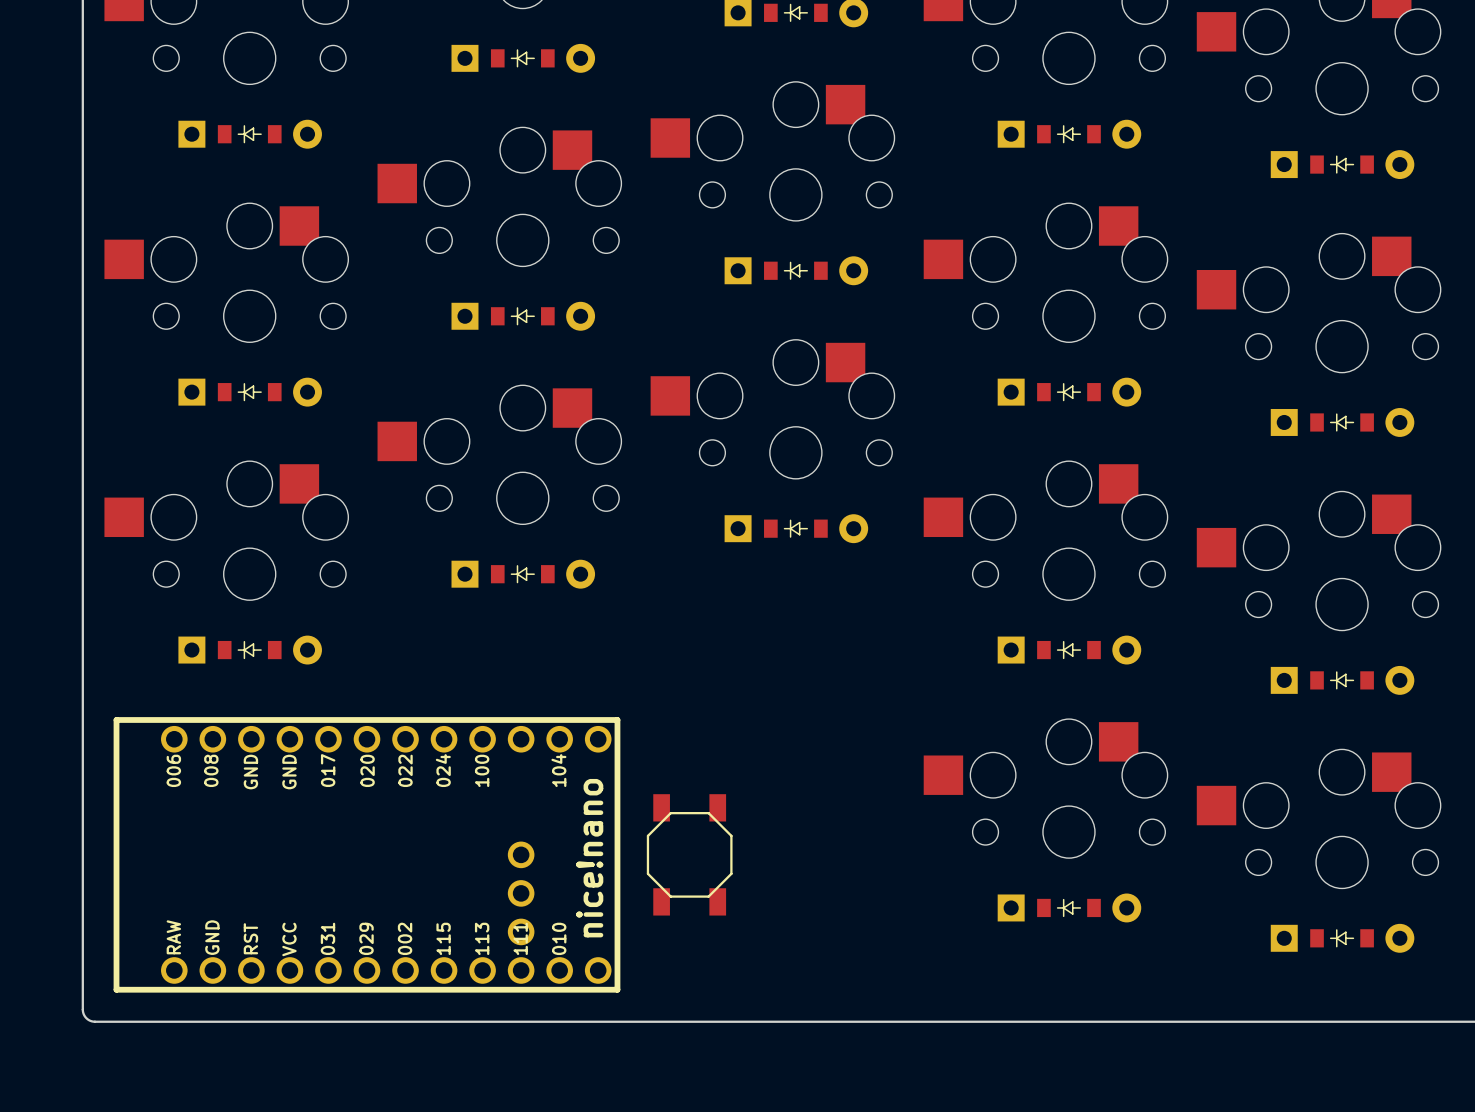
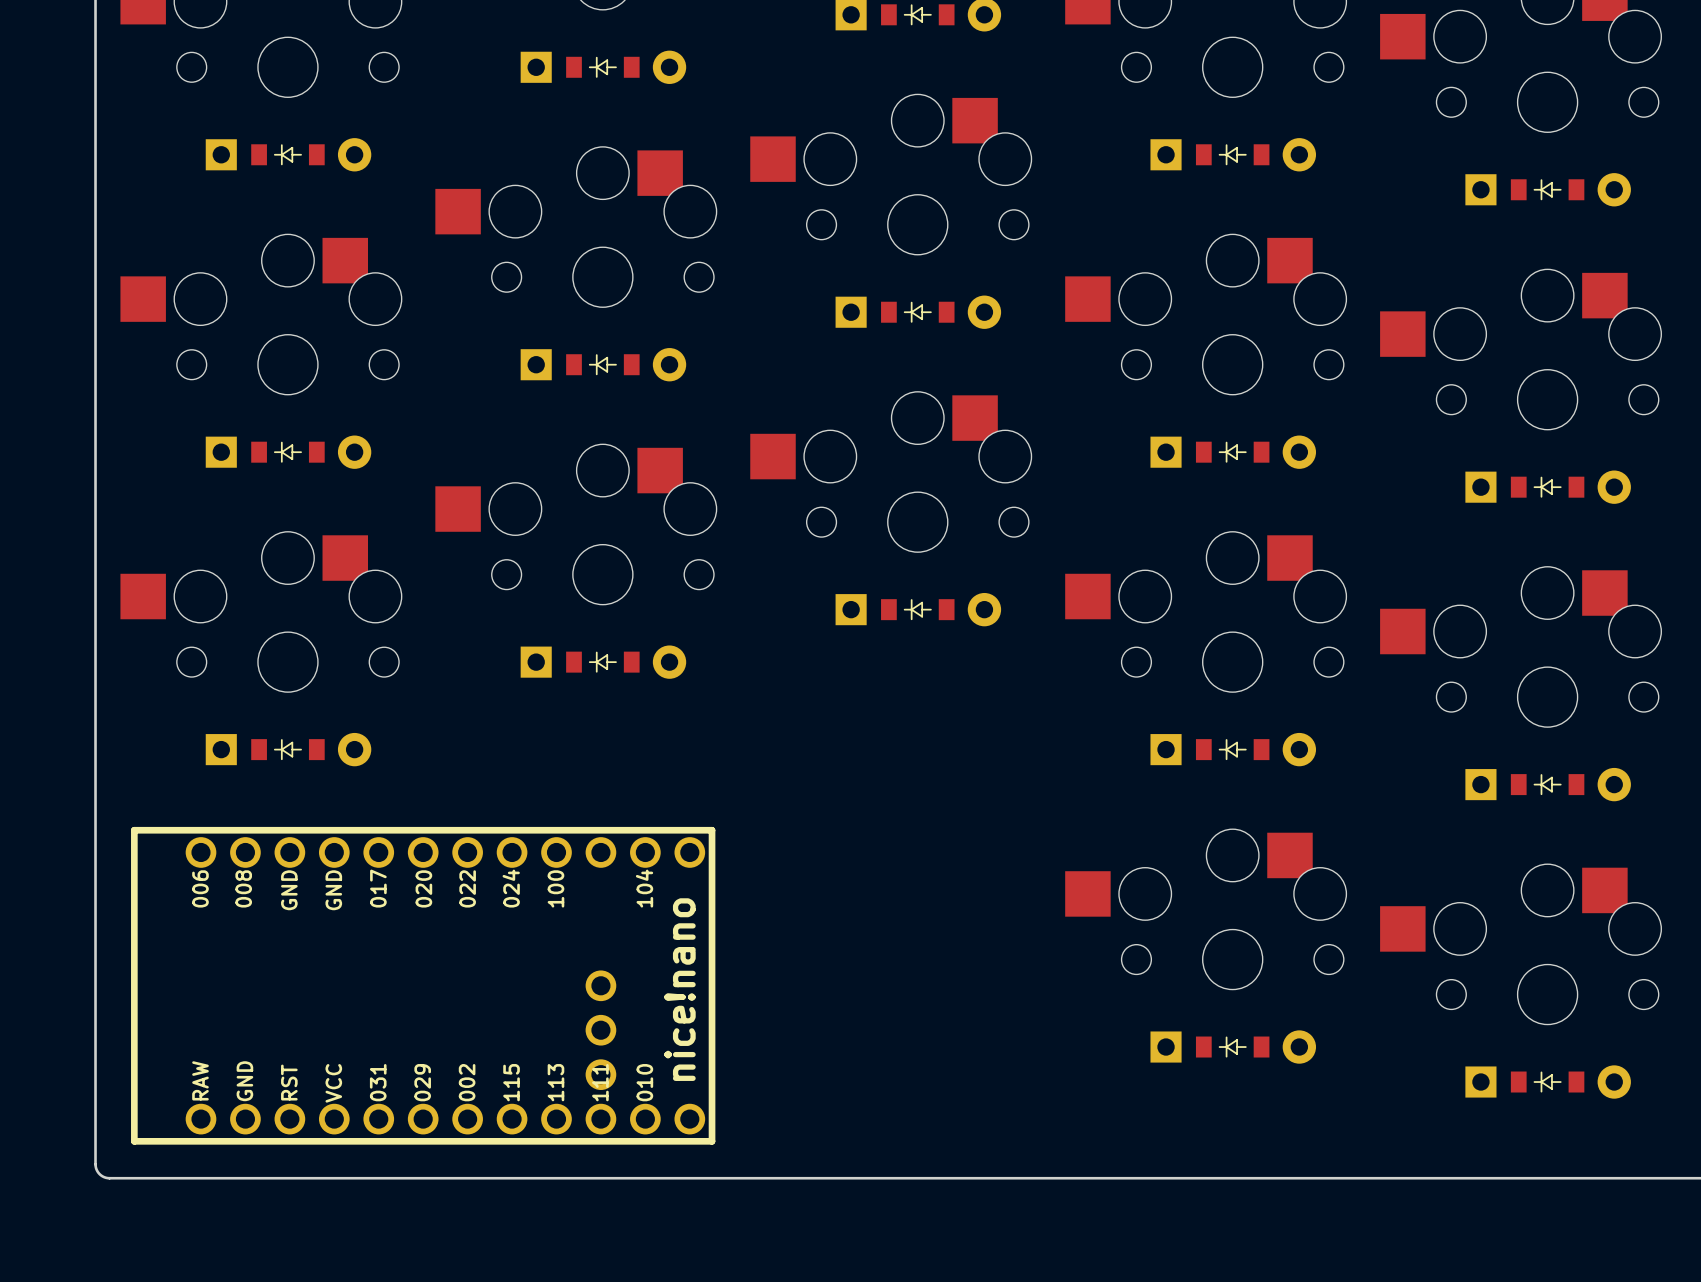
part: (689, 854) -> none

